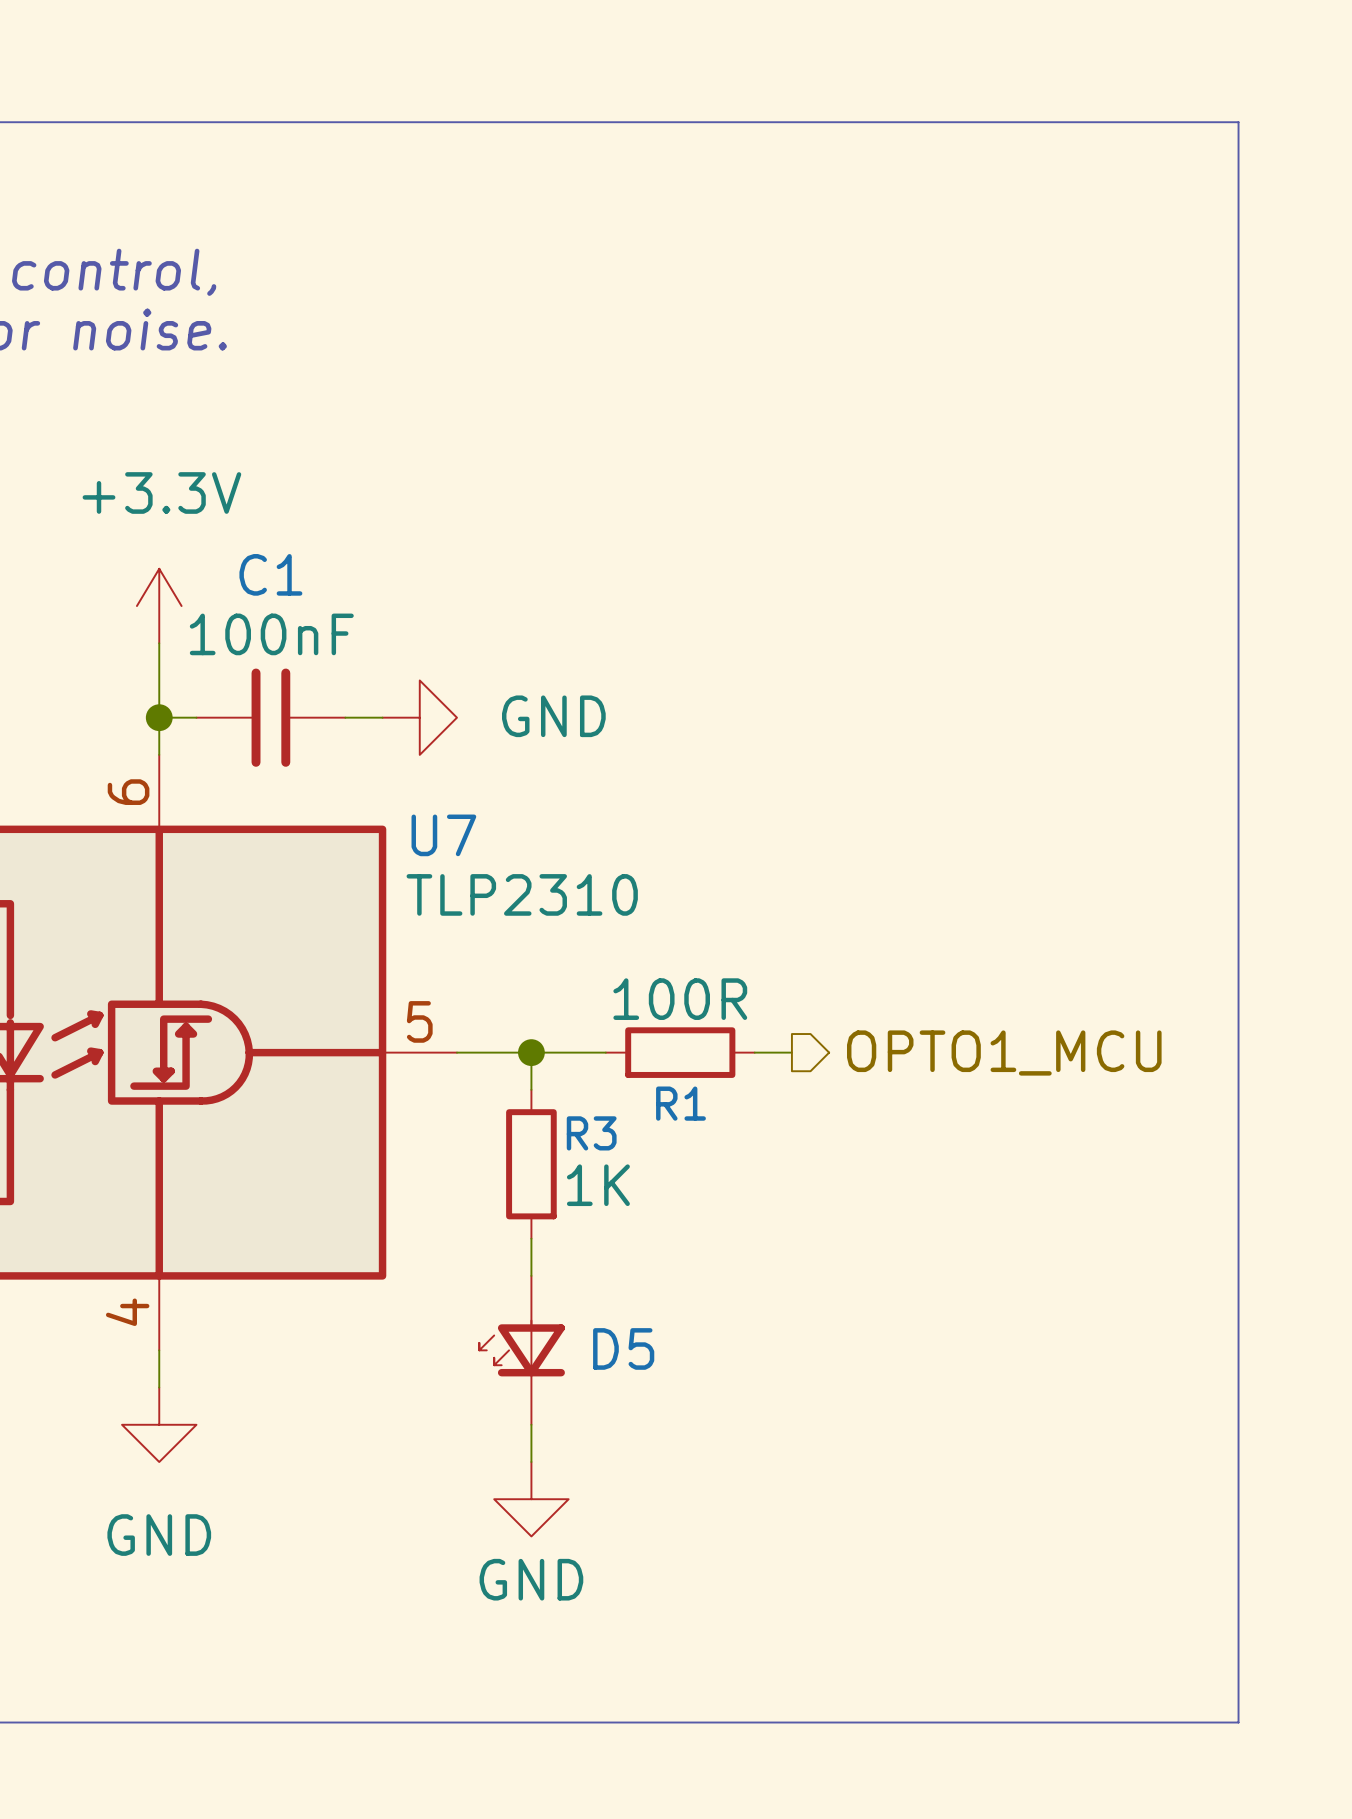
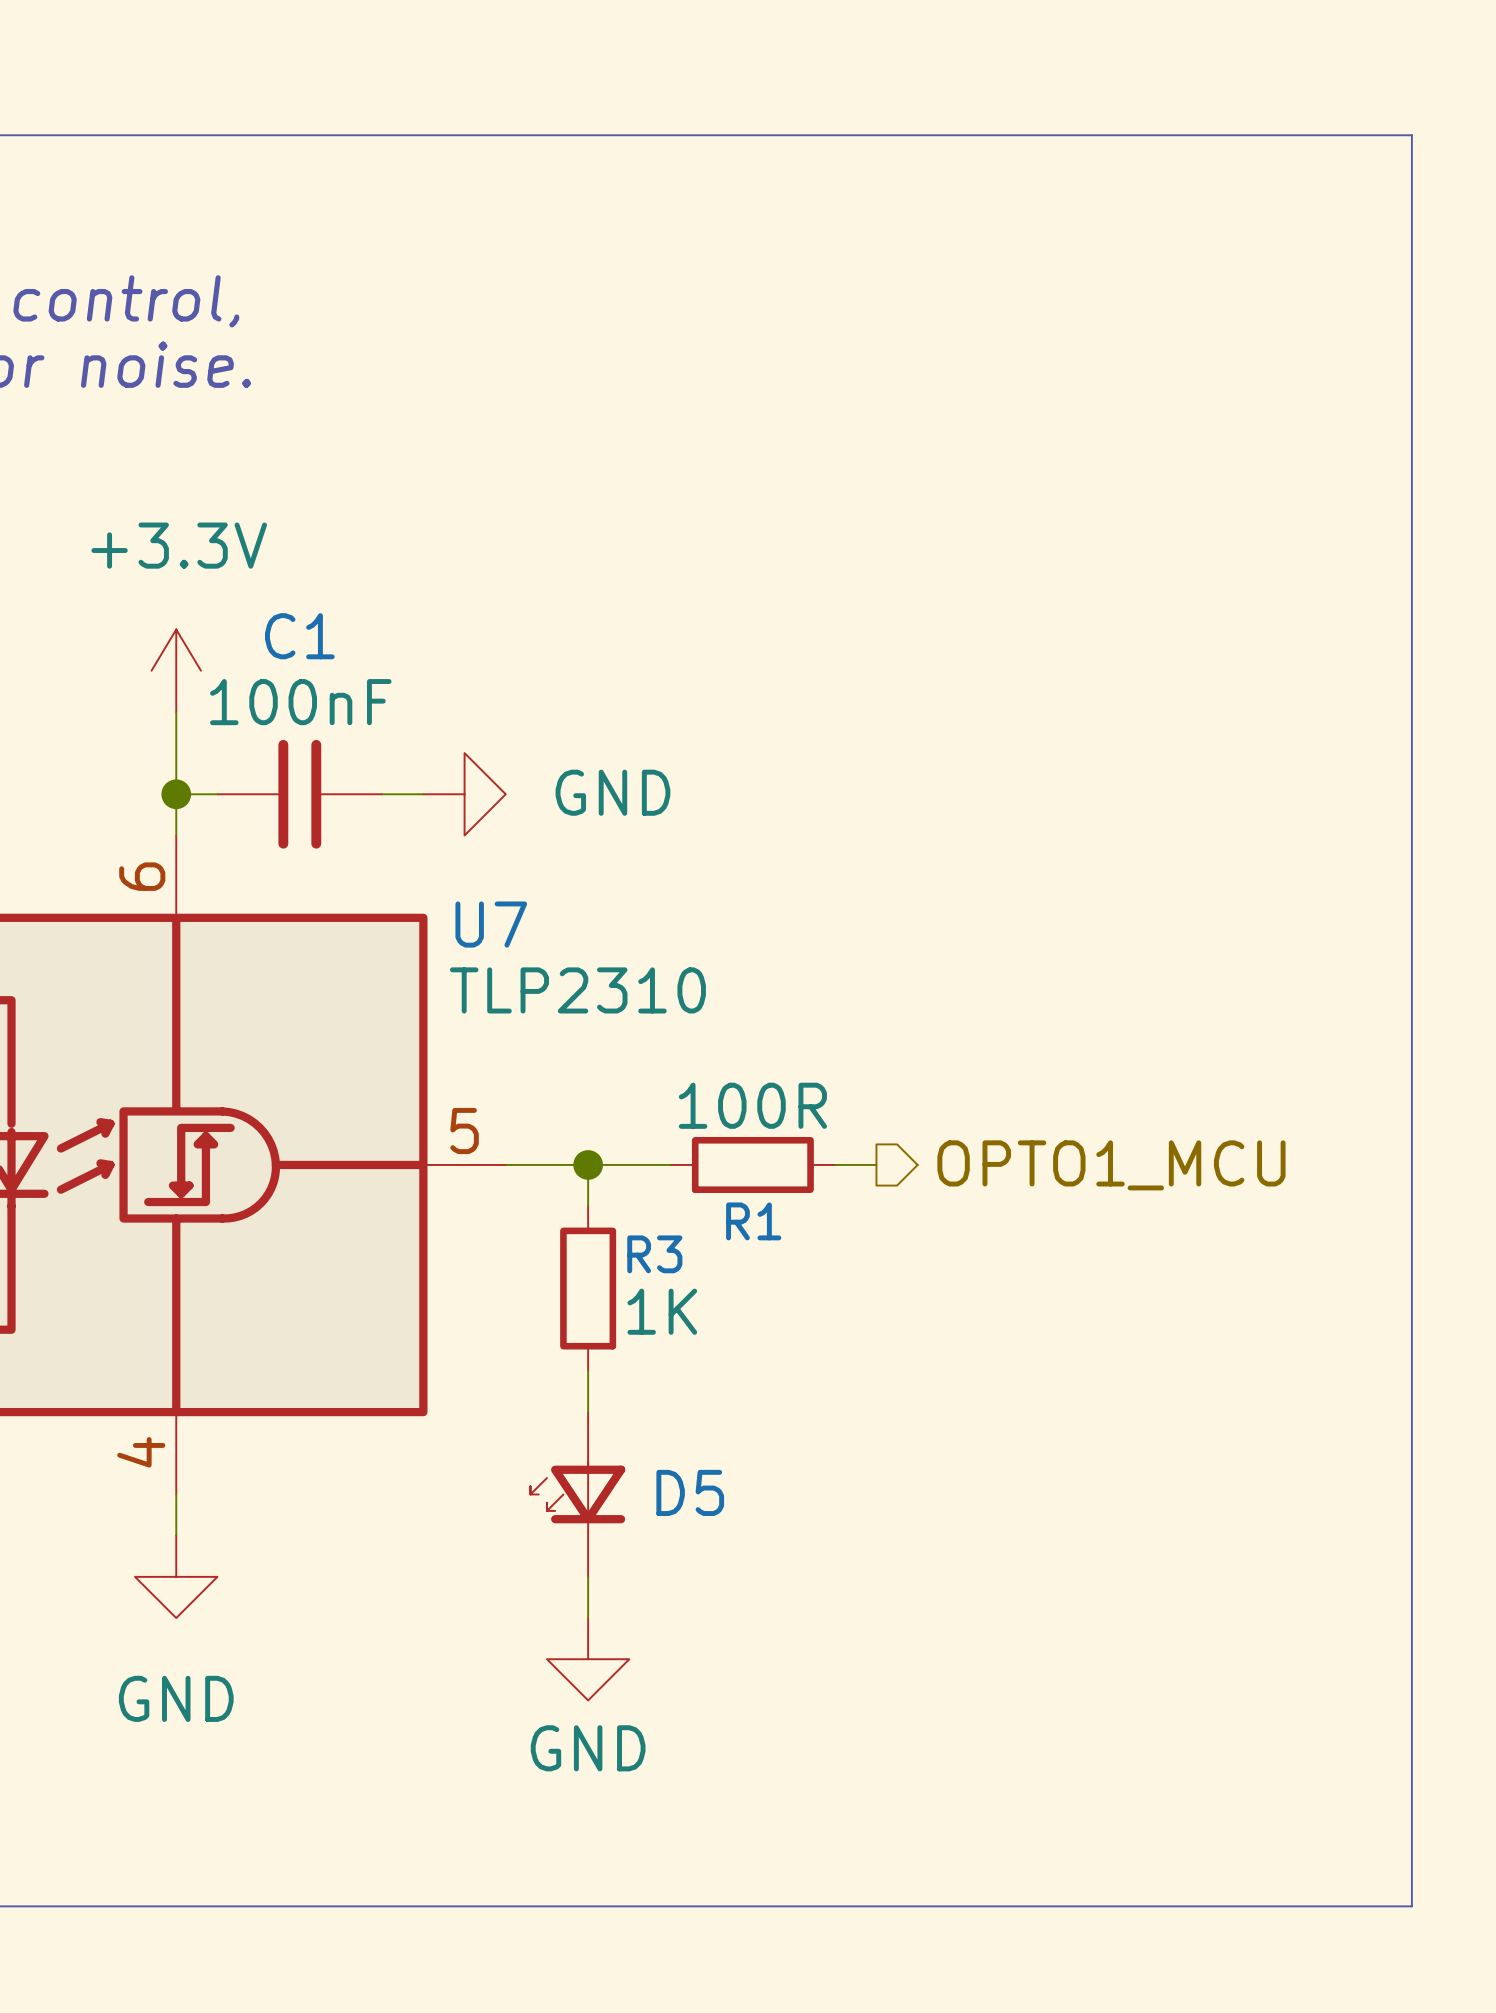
line: (1238, 122) (1238, 1722) -> (1370, 135) (1411, 135) (1411, 1906) (1370, 1906)

